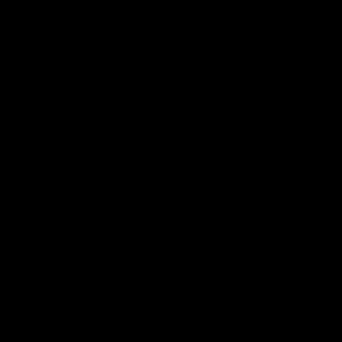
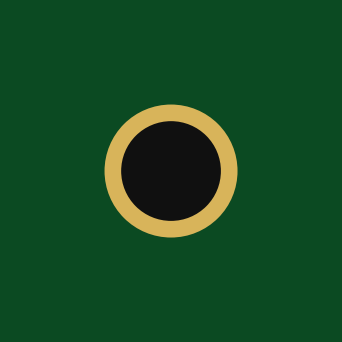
part: none -> (171, 171)

